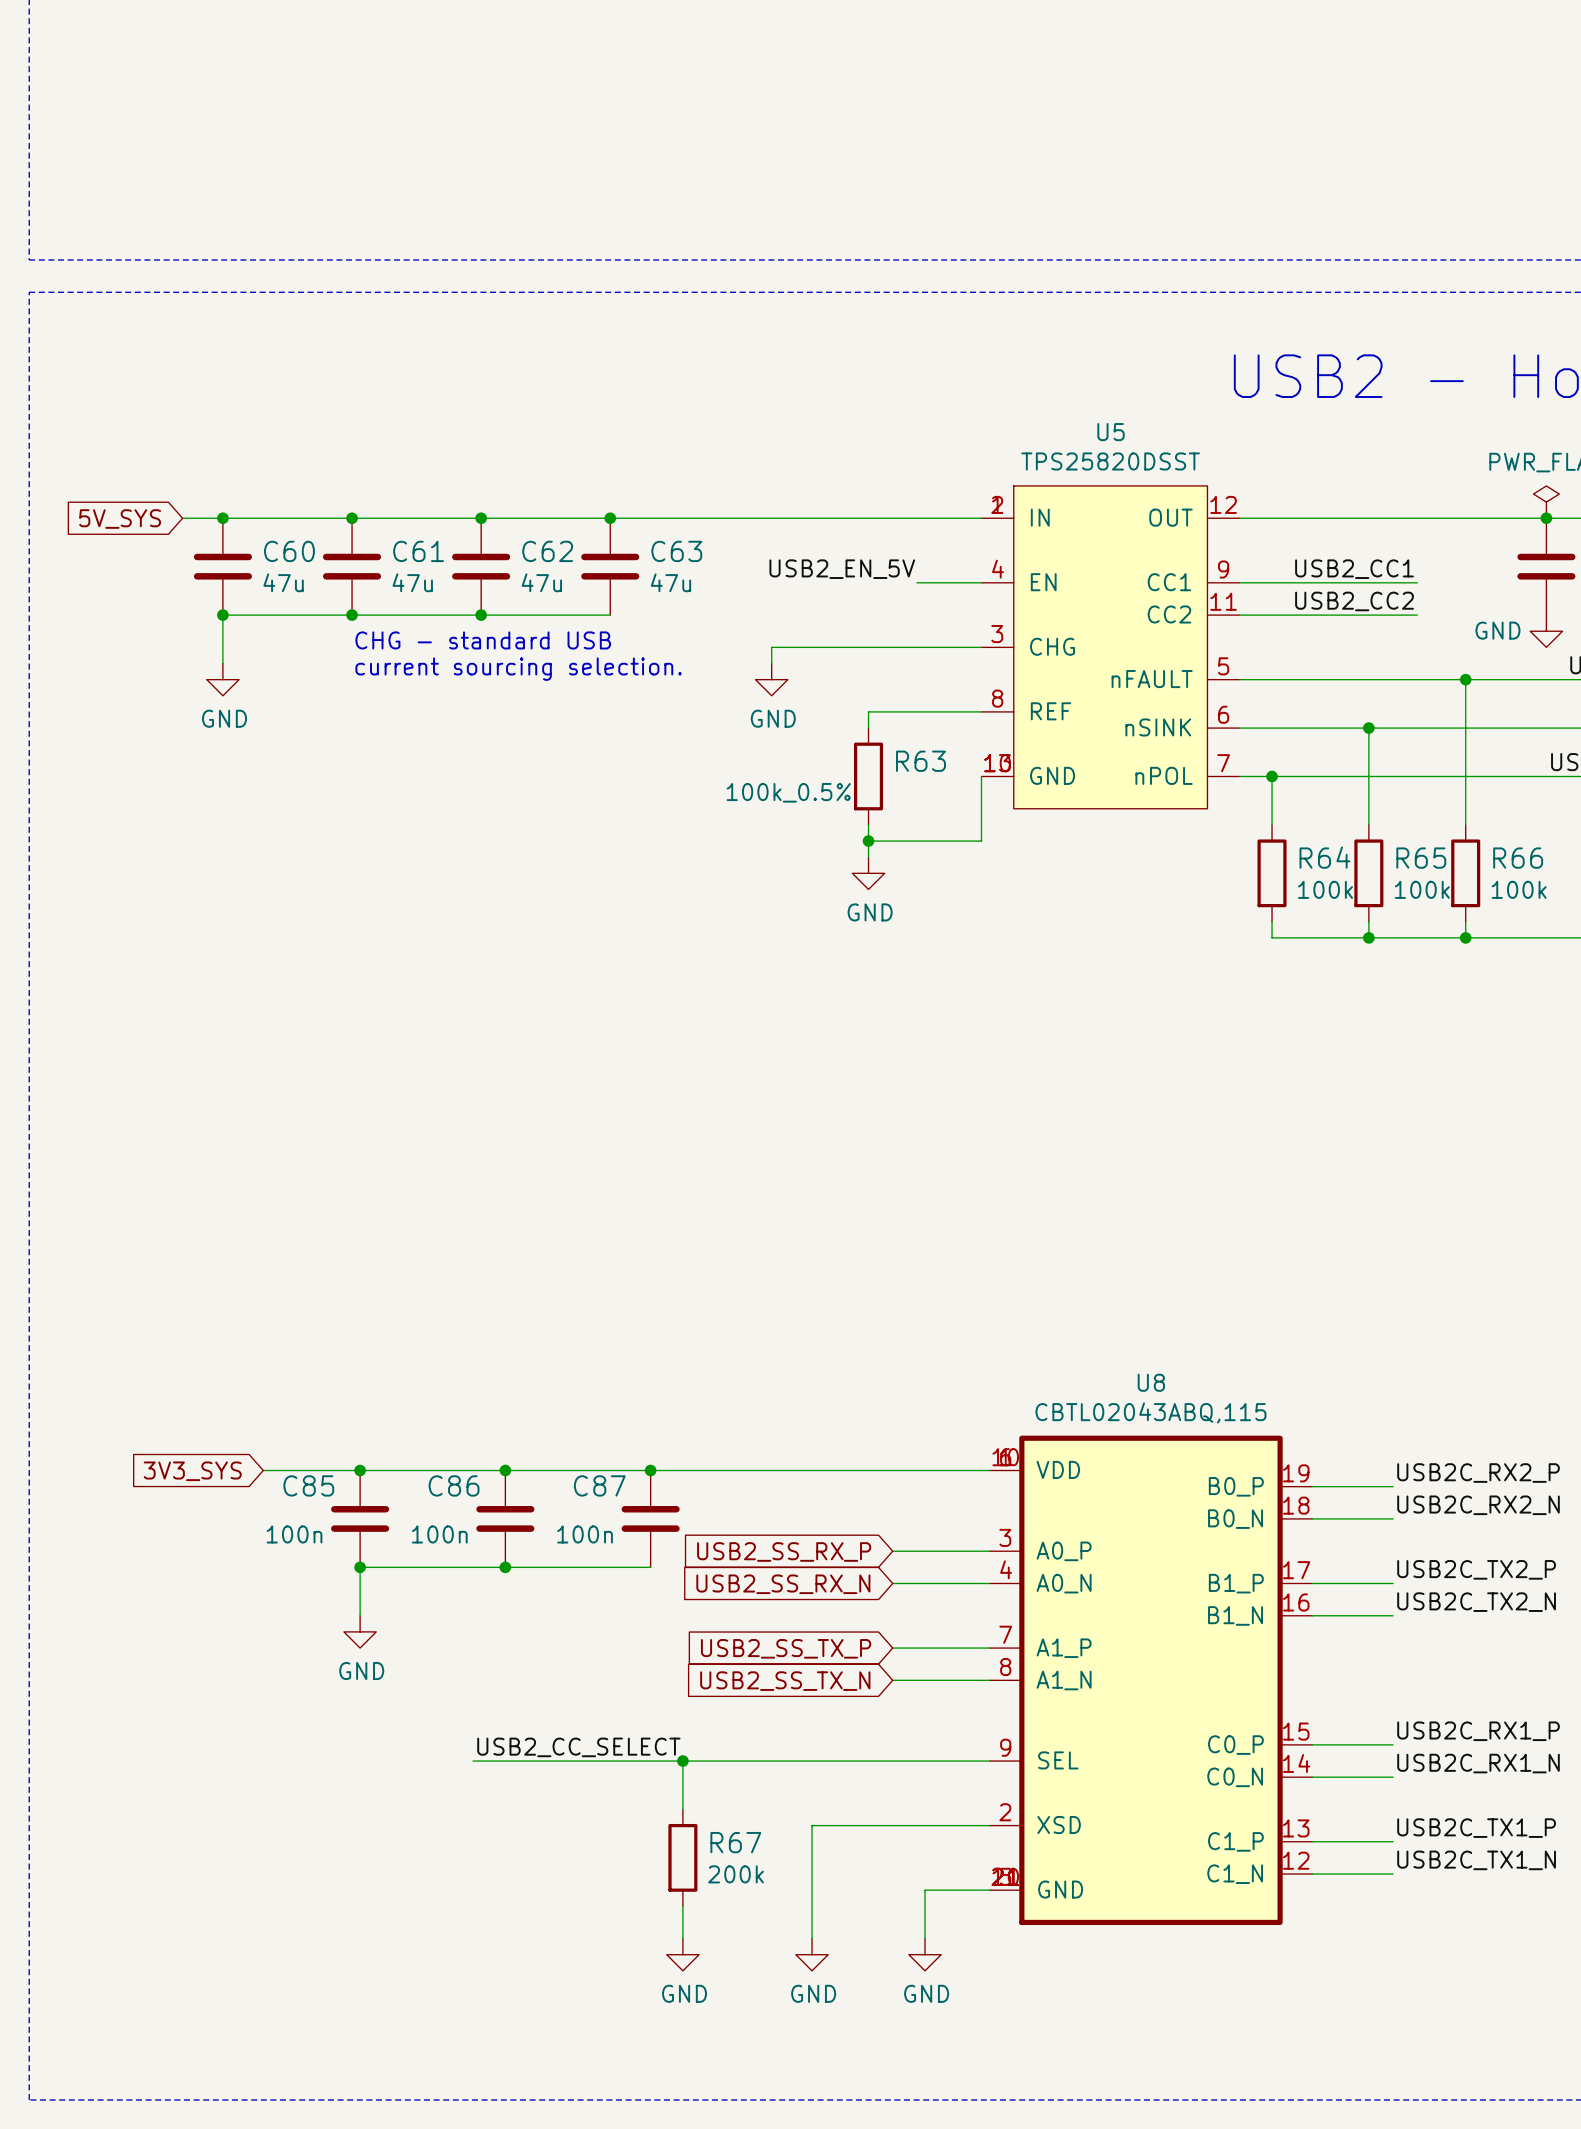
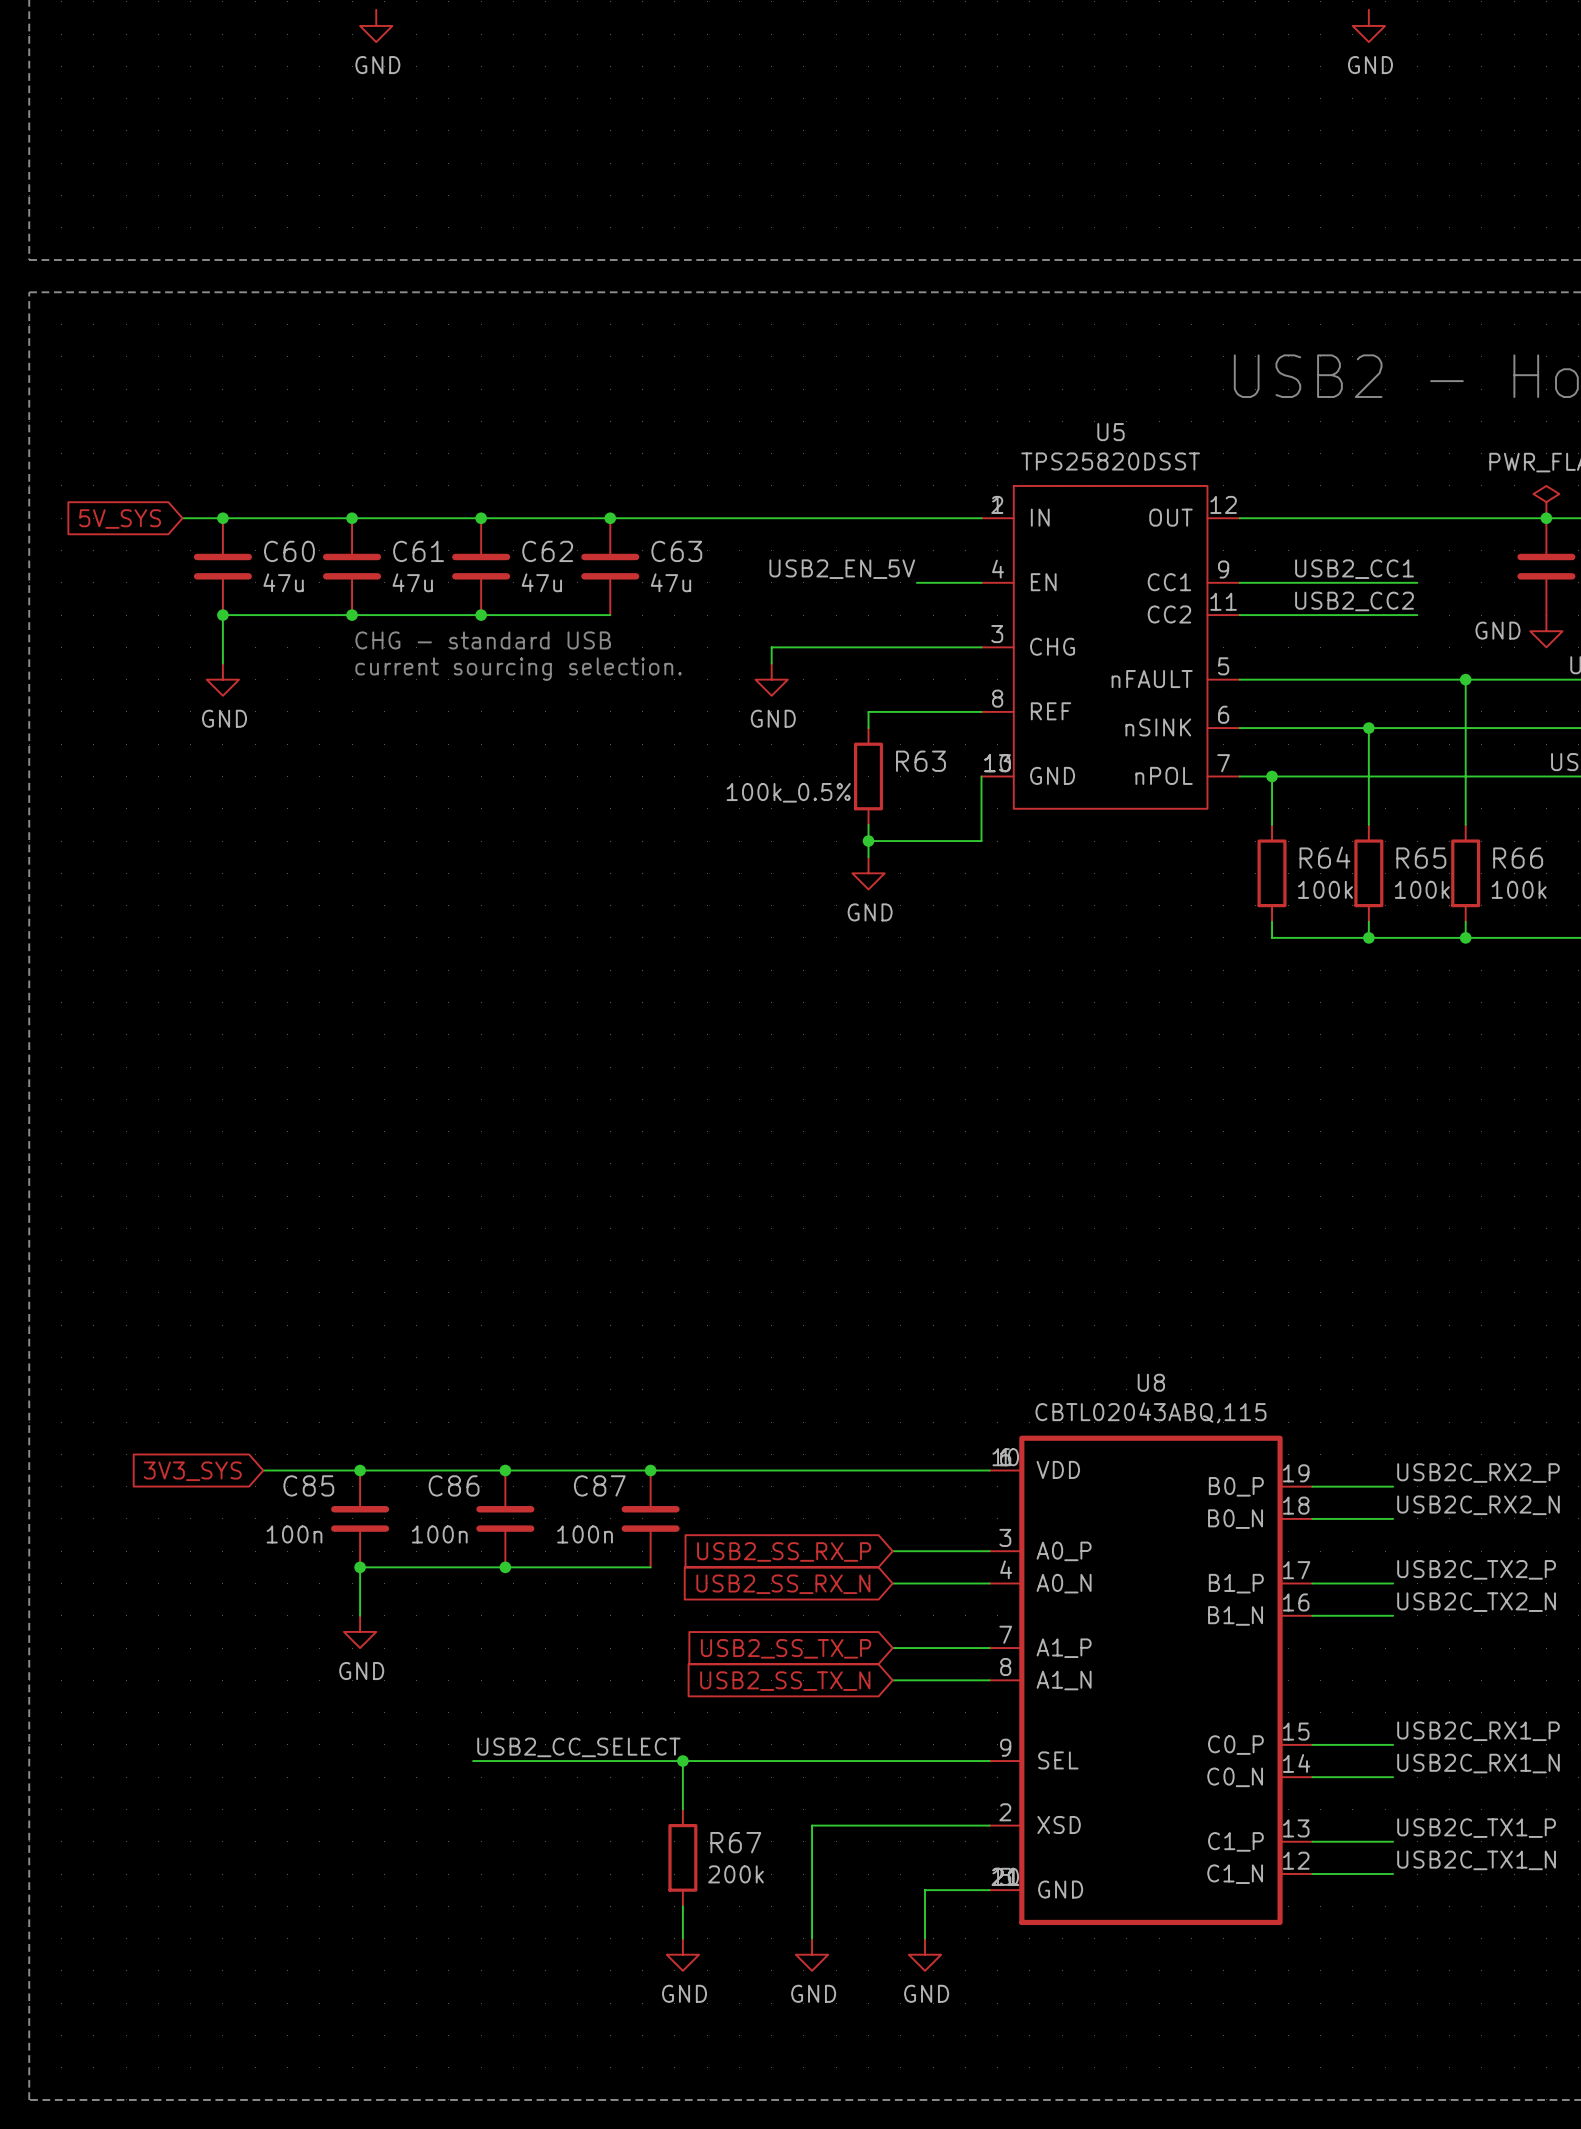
power symbol: none -> GND (376, 25)
power symbol: none -> GND (1368, 25)

